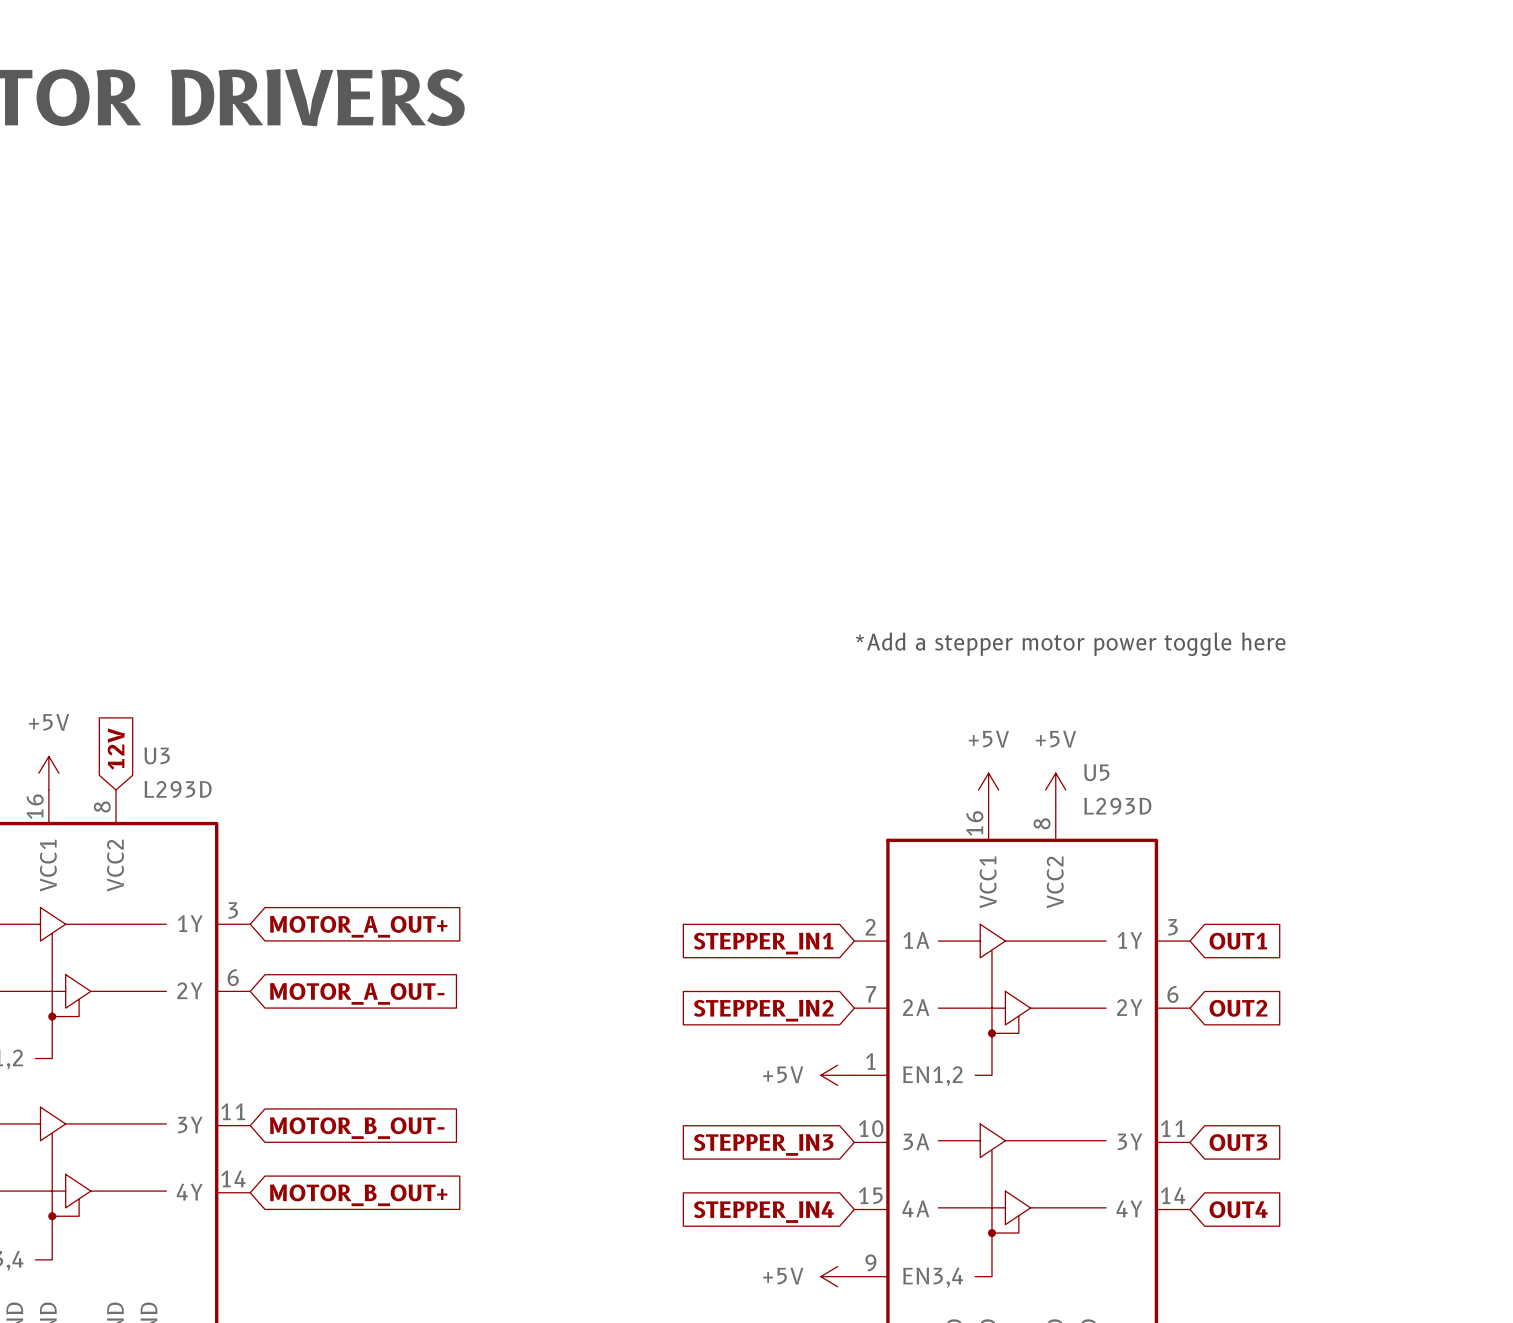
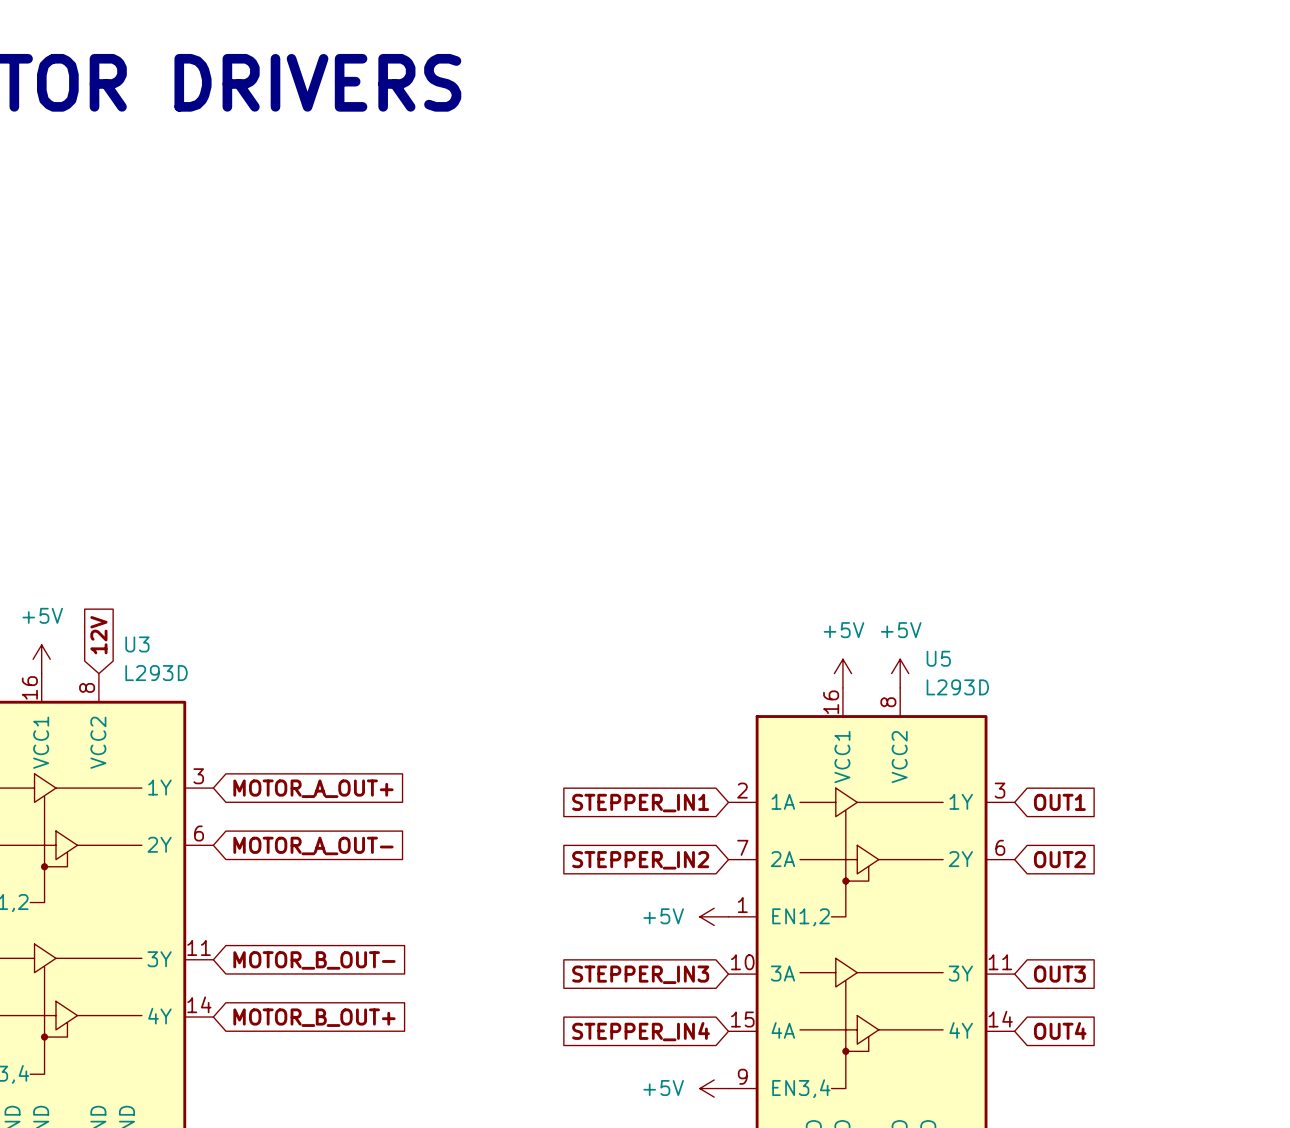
text: *Add a stepper motor power toggle here (1070, 644) -> none

